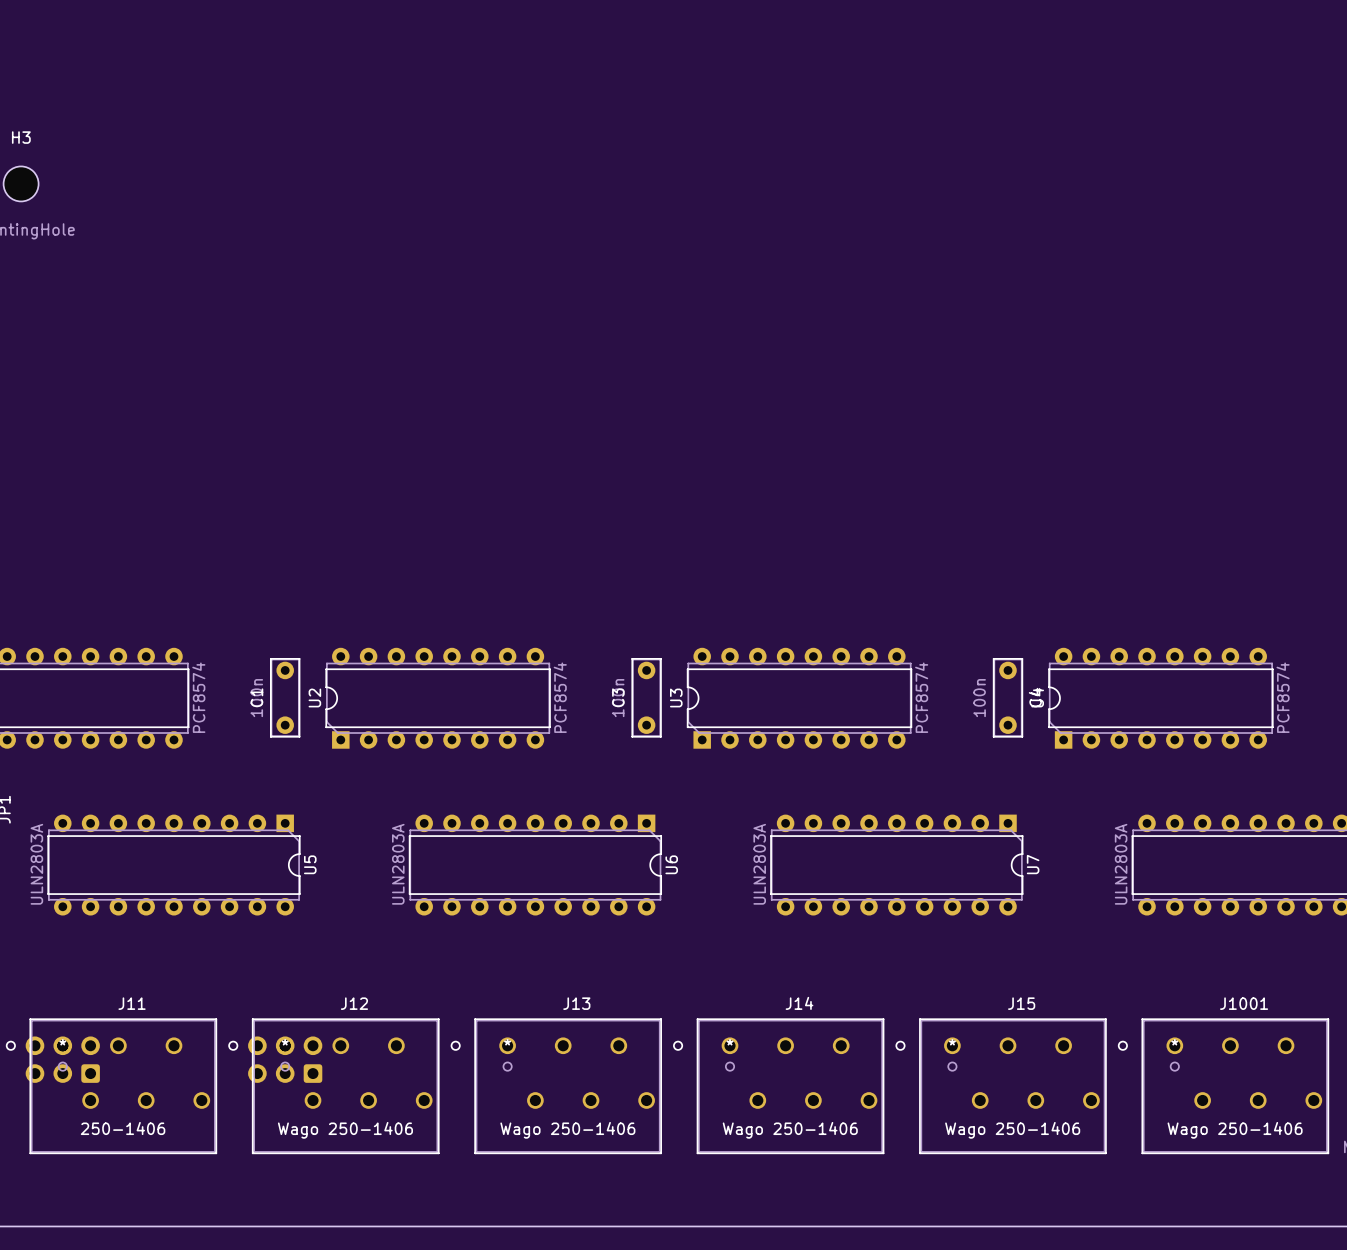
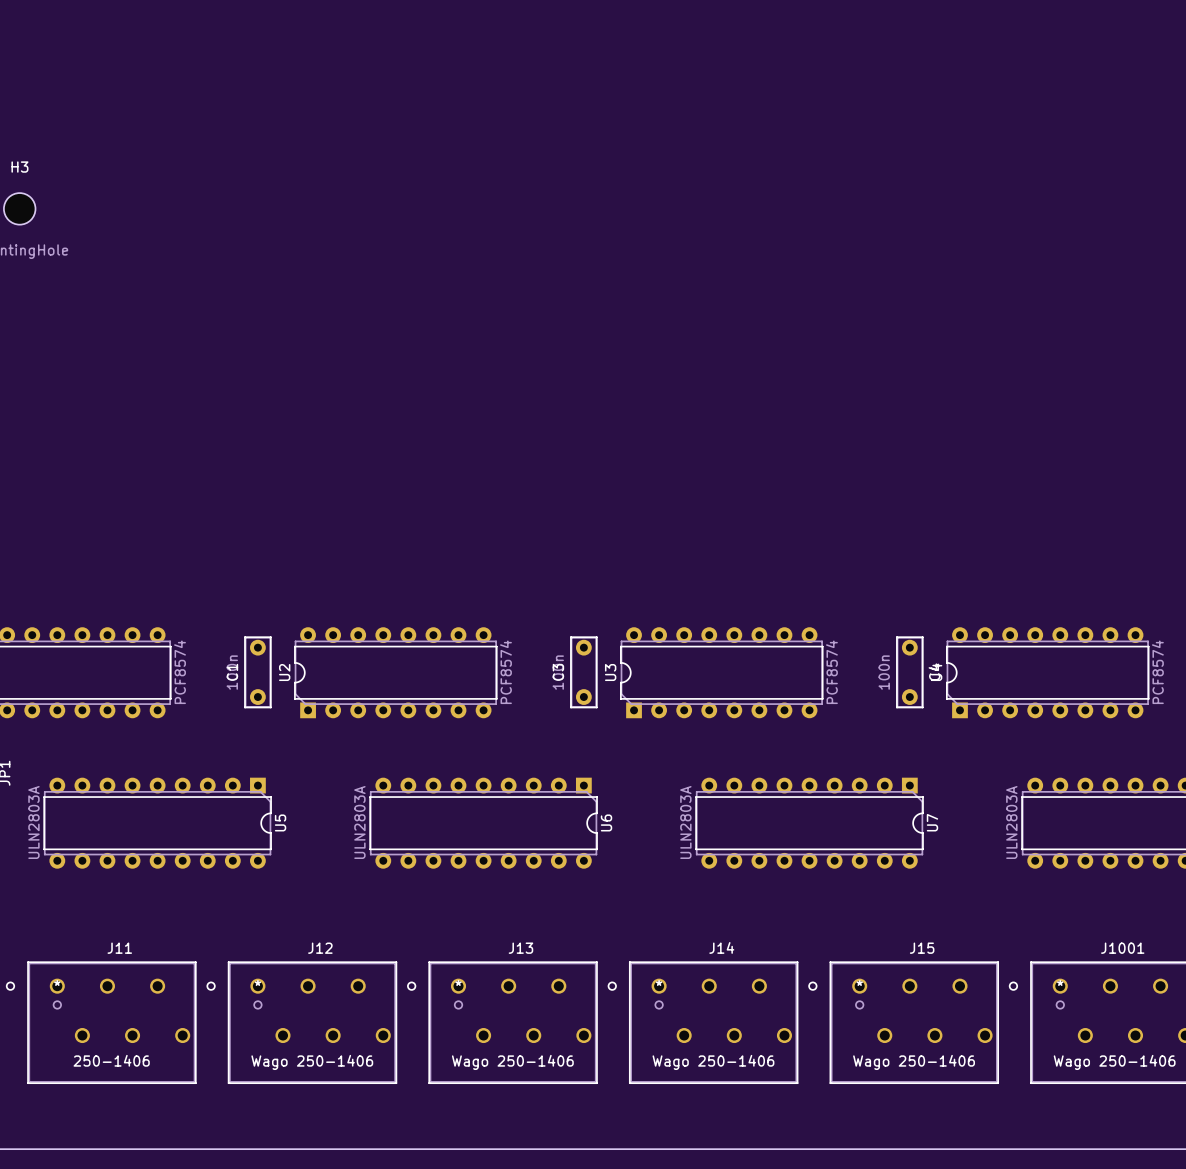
part: (62, 1059) -> none
part: (285, 1059) -> none

